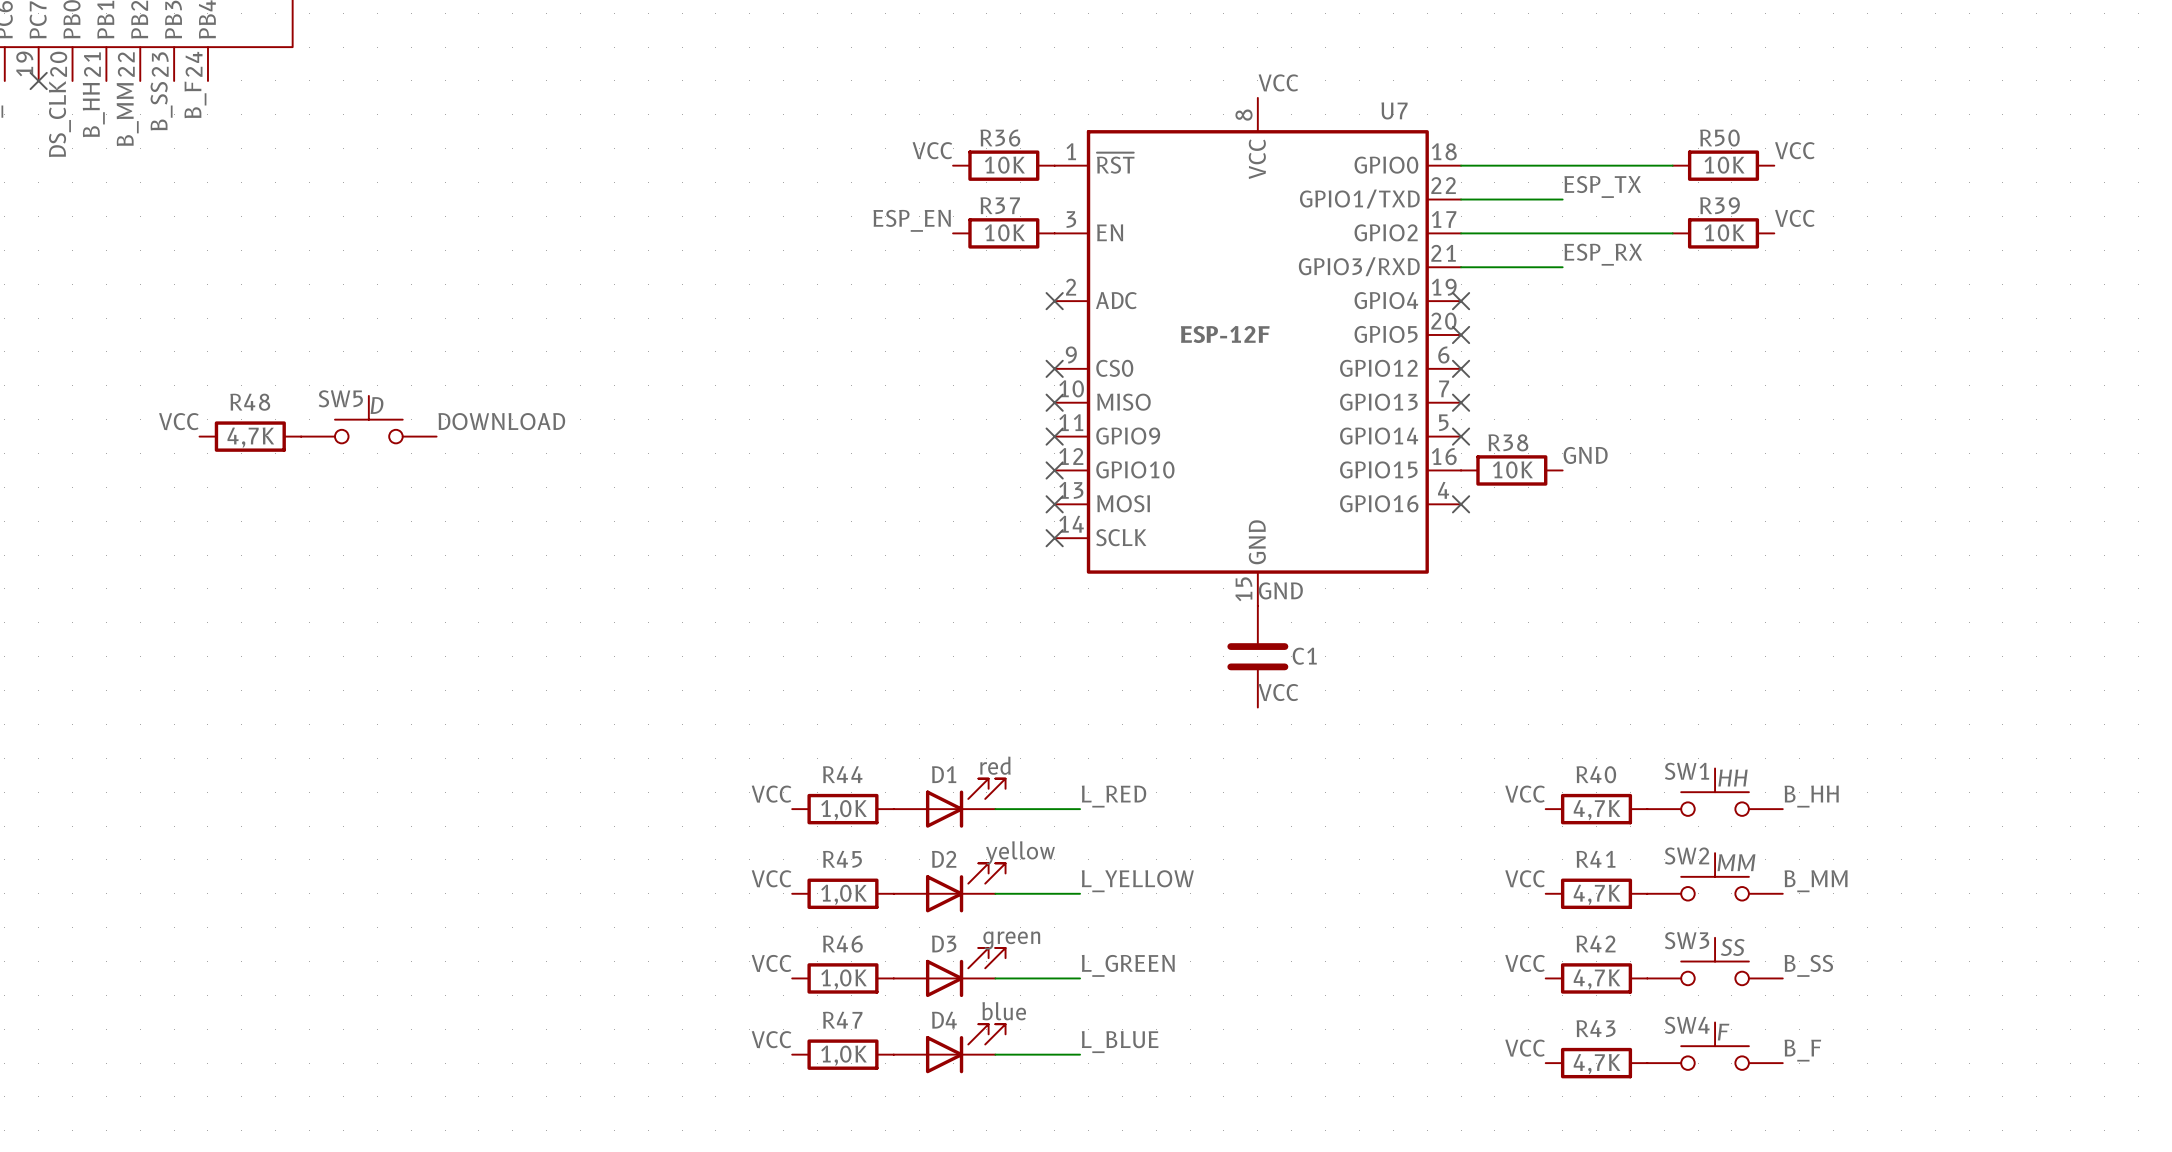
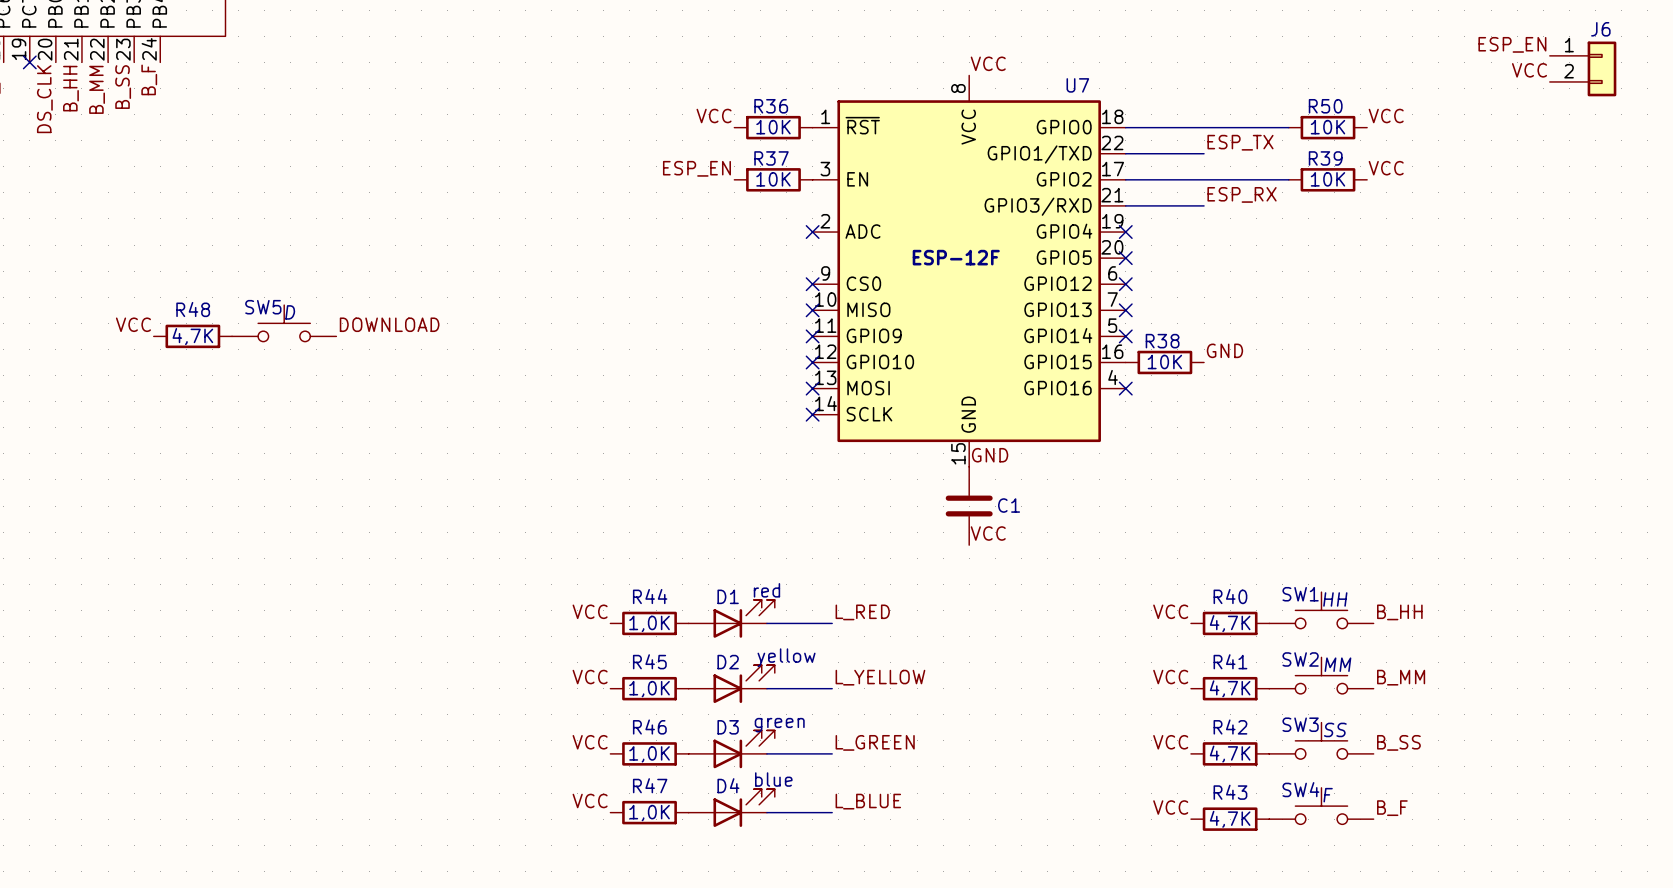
label: none -> ESP_EN (1512, 44)
J6: none -> (1583, 68)
label: none -> VCC (1529, 70)

